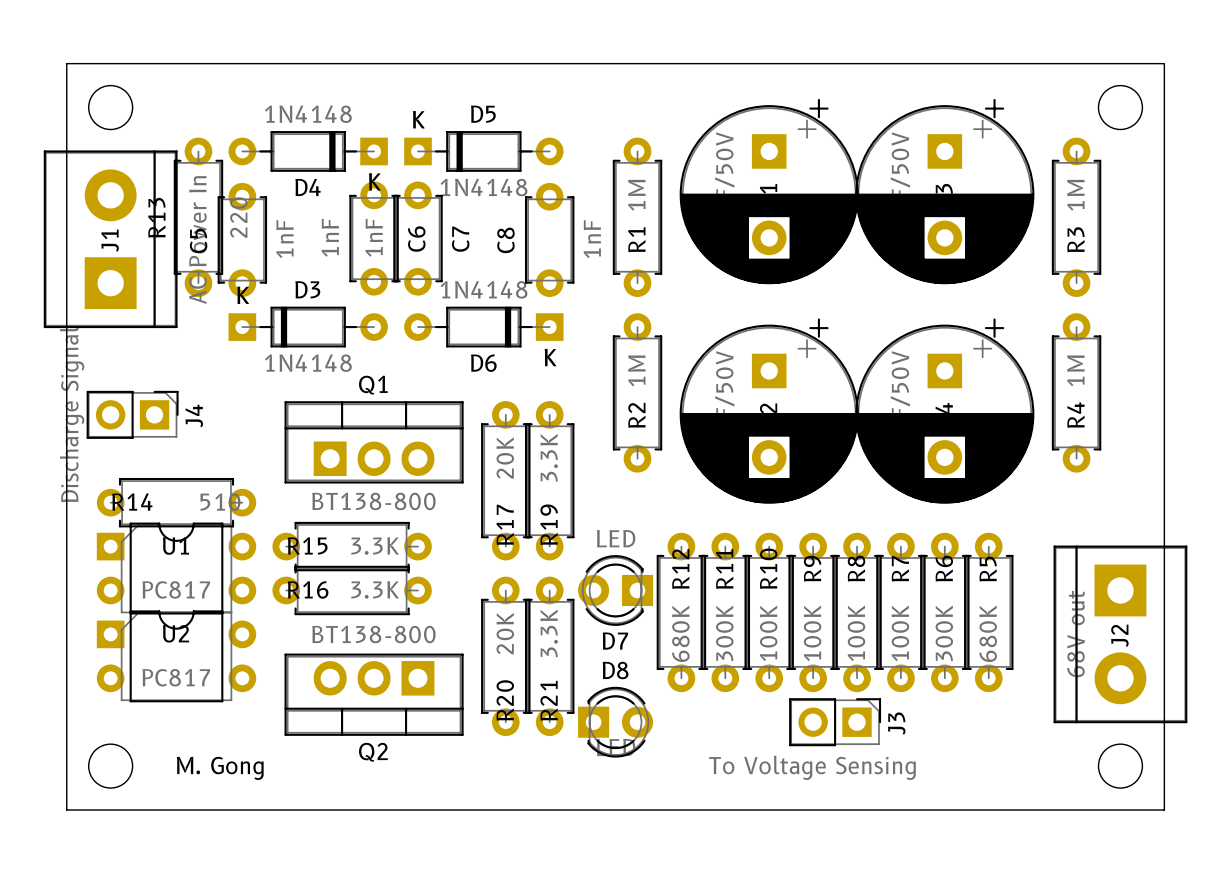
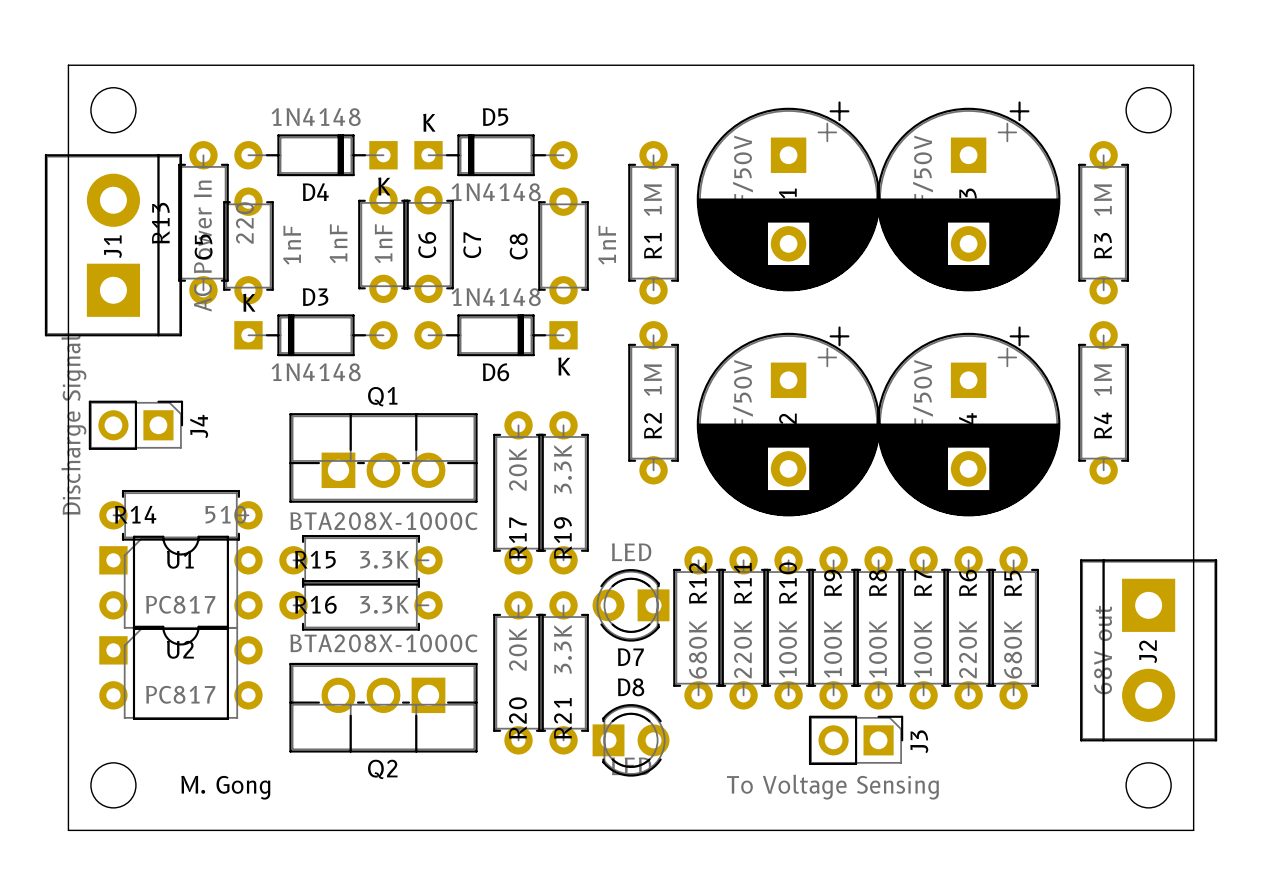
Q1 footprint: [284, 401, 464, 484] -> [289, 413, 478, 503]
Q1 value: BT138-800 (373, 501) -> BTA208X-1000C (383, 521)
R11 value: 300K (724, 633) -> 220K (742, 649)
R6 value: 300K (944, 633) -> 220K (968, 649)
Q2 value: BT138-800 (373, 634) -> BTA208X-1000C (383, 643)
Q2 footprint: [284, 653, 464, 736] -> [289, 662, 478, 753]

